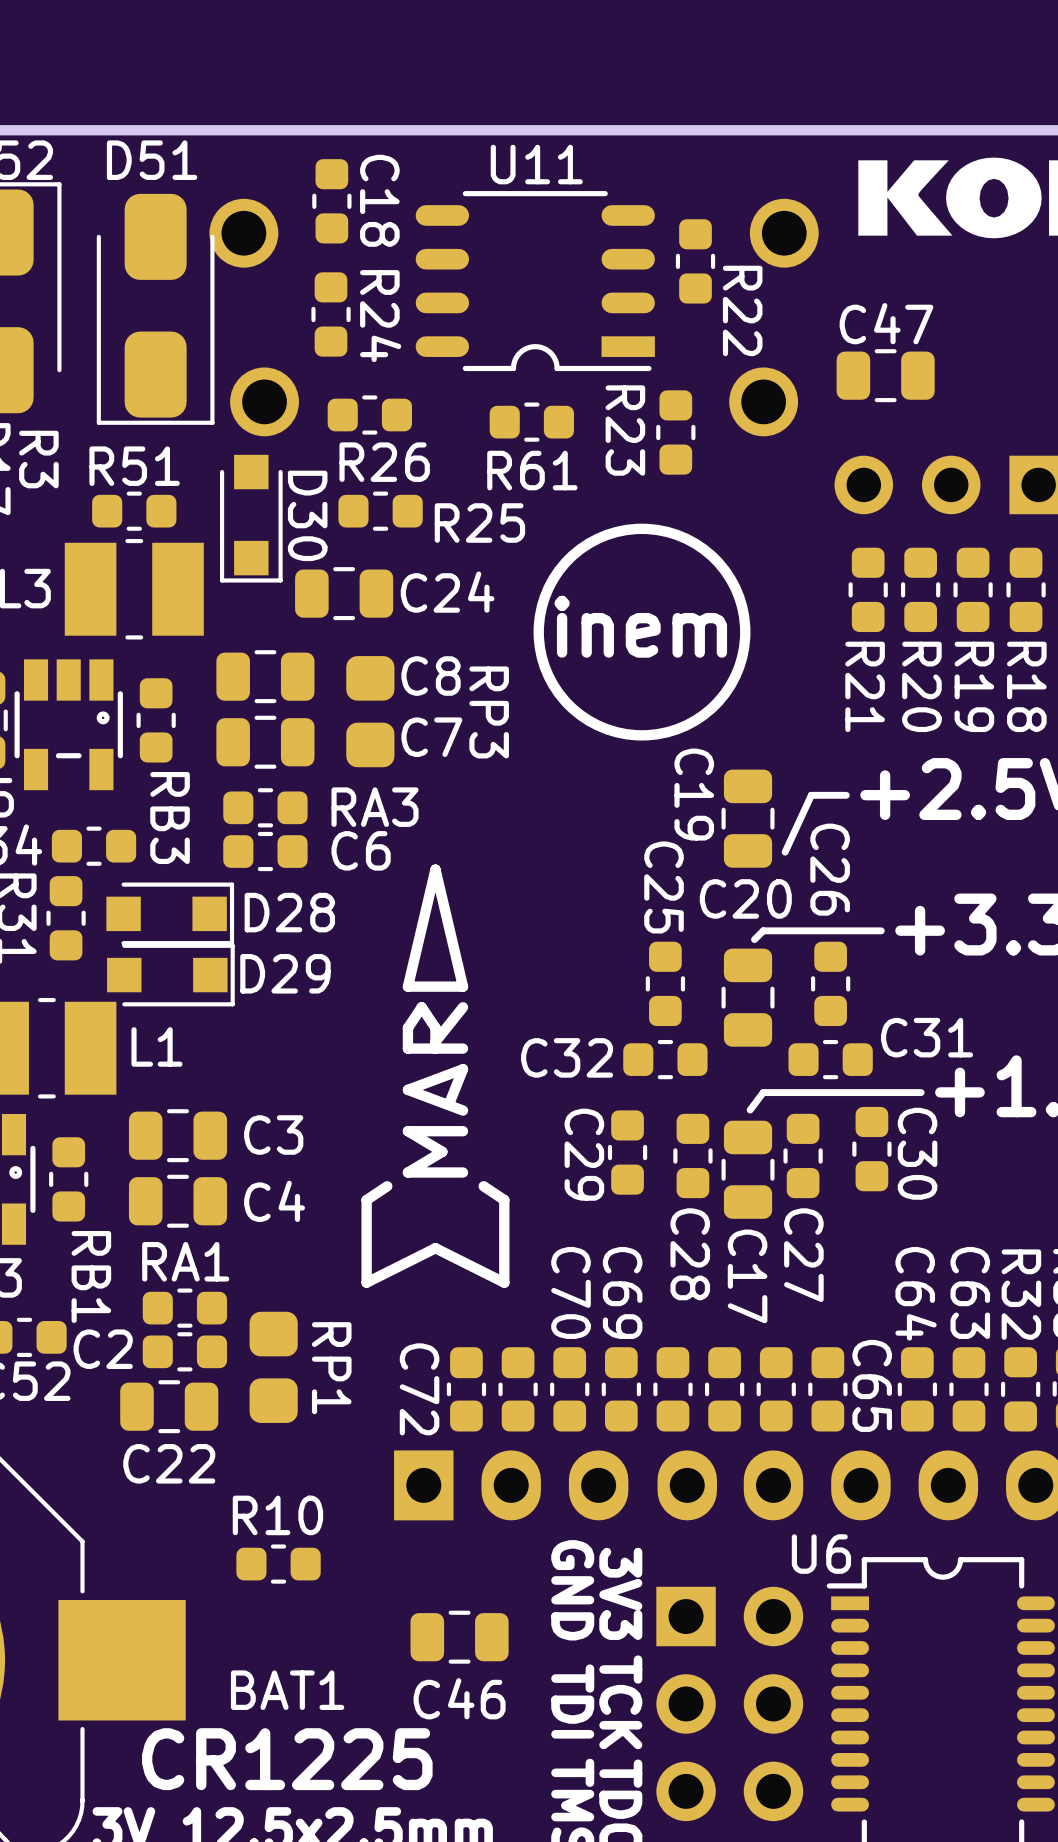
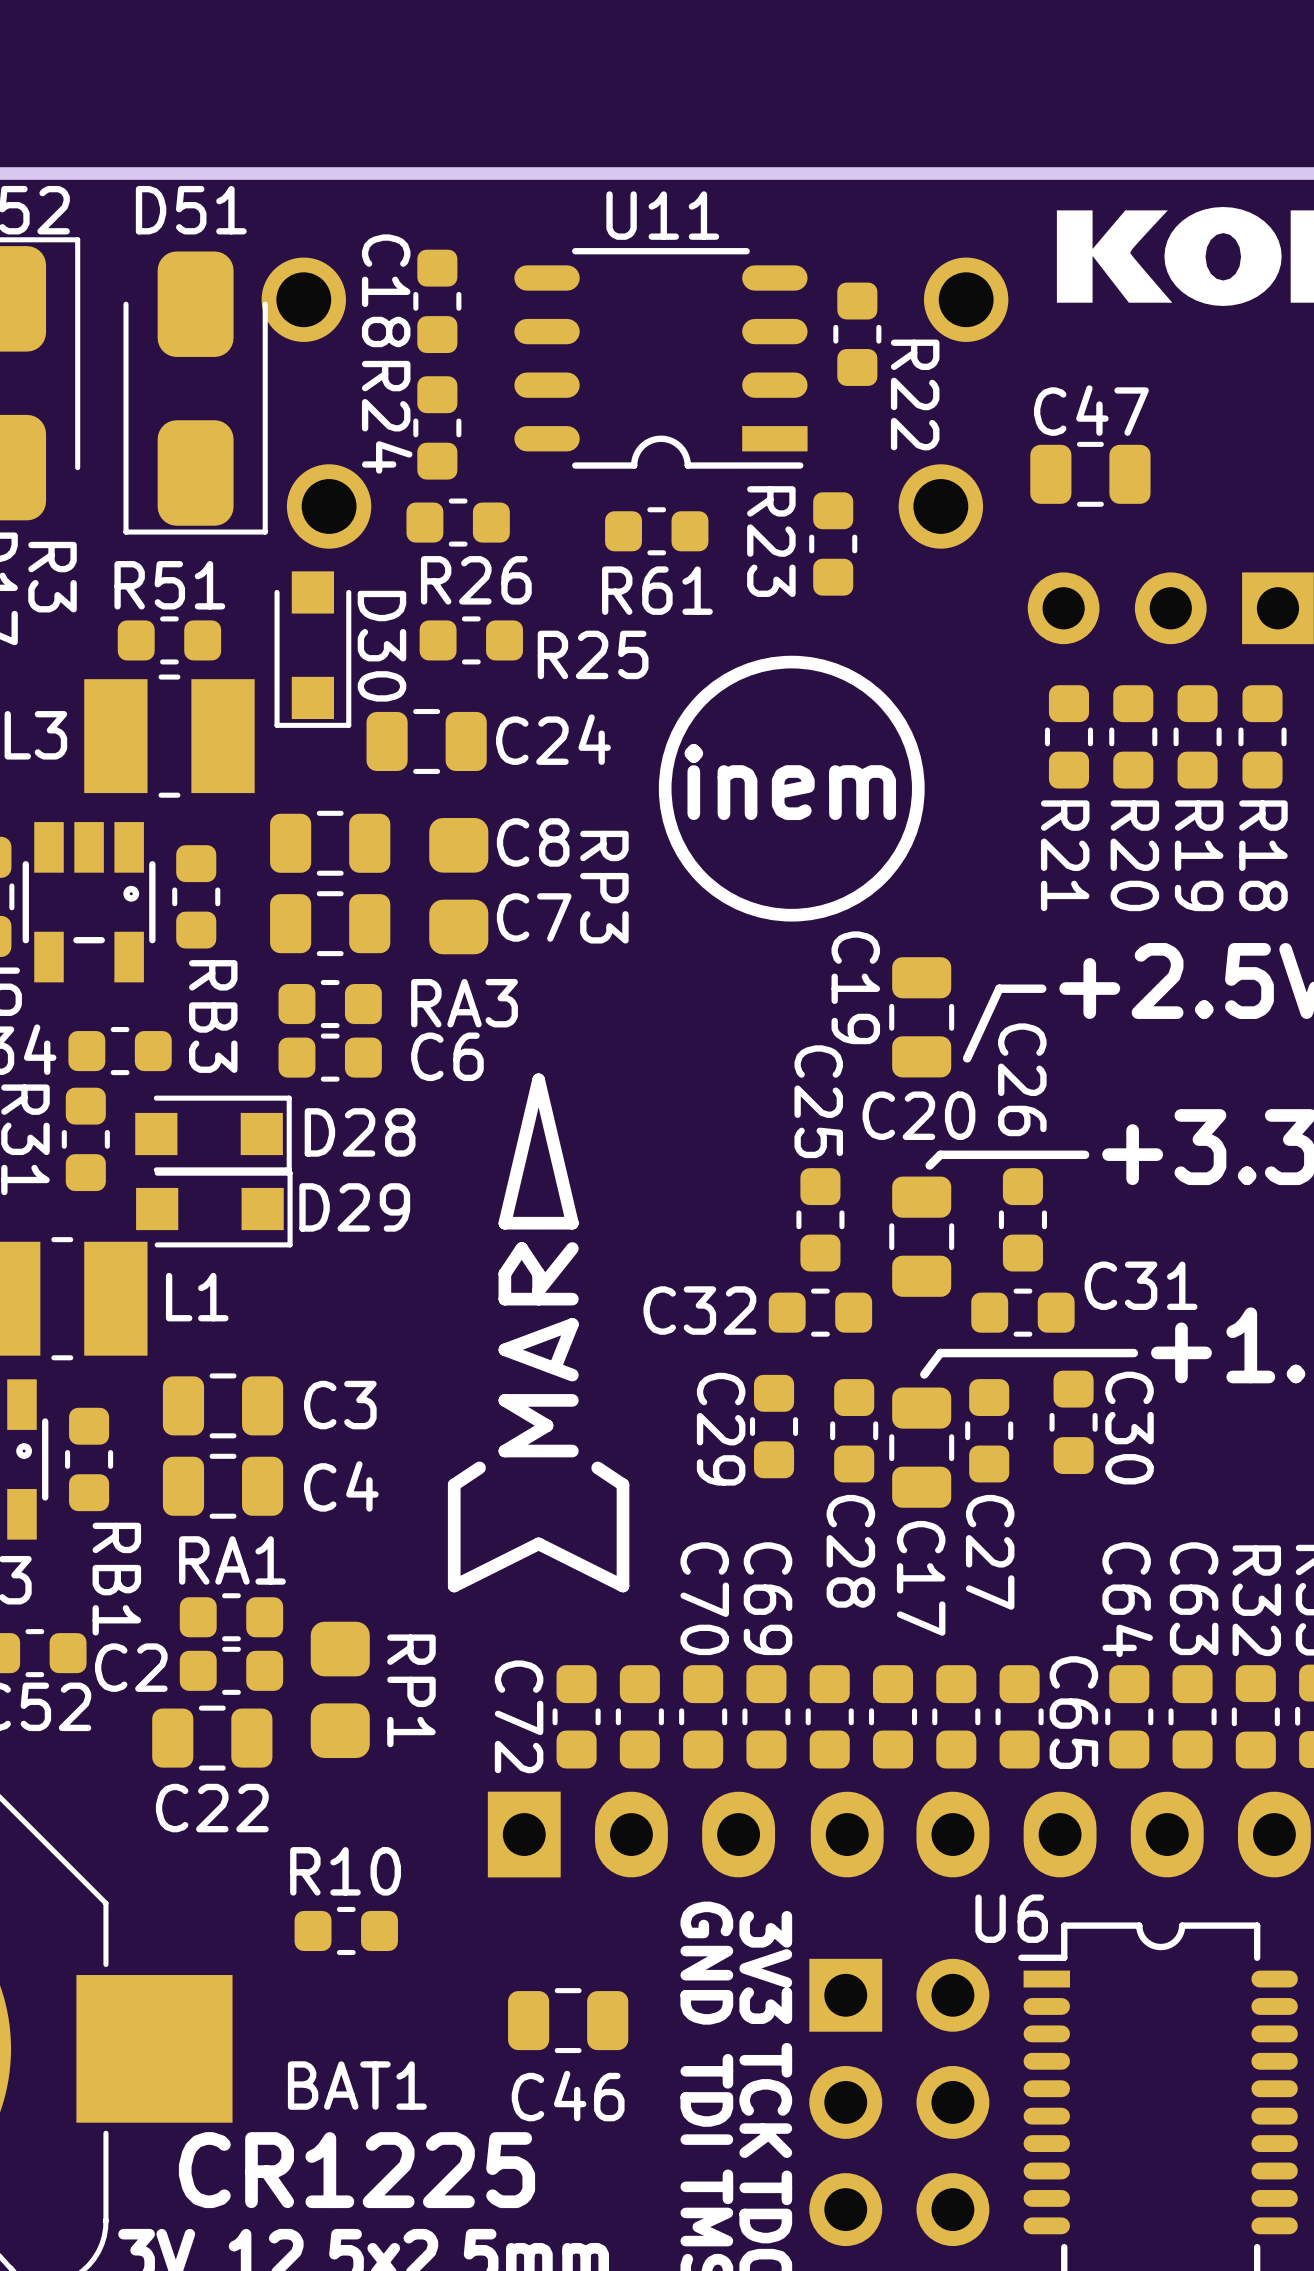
C18 name position: C18 (379, 200) -> C18 (386, 290)
C18 position: (331, 201) -> (437, 301)
R24 position: (331, 314) -> (437, 427)
R24 name position: R24 (380, 316) -> R24 (387, 417)

